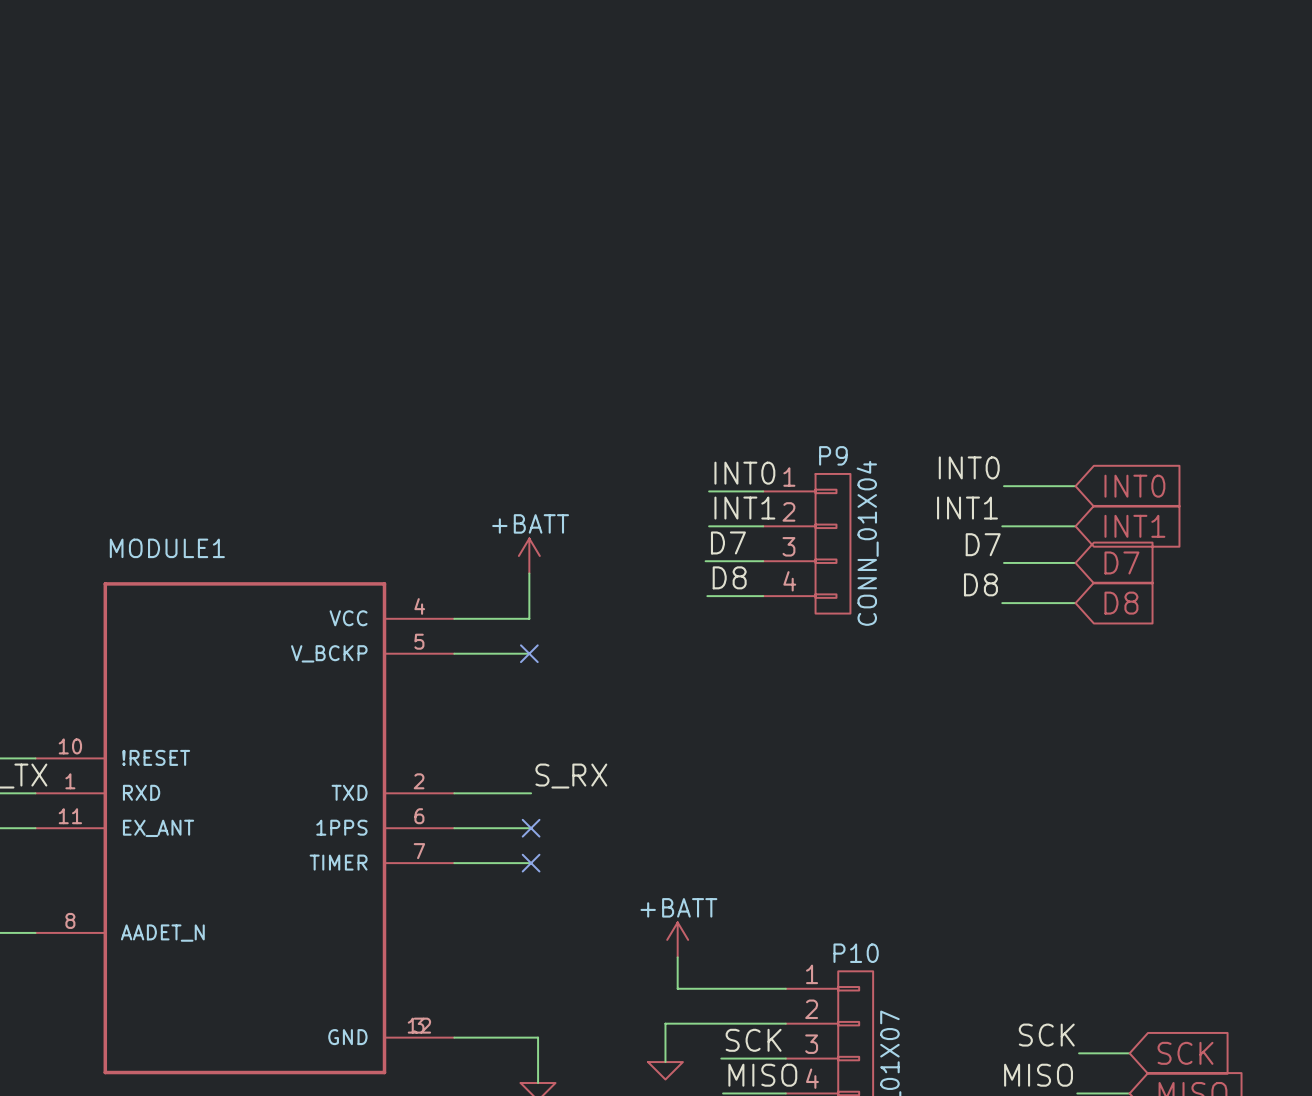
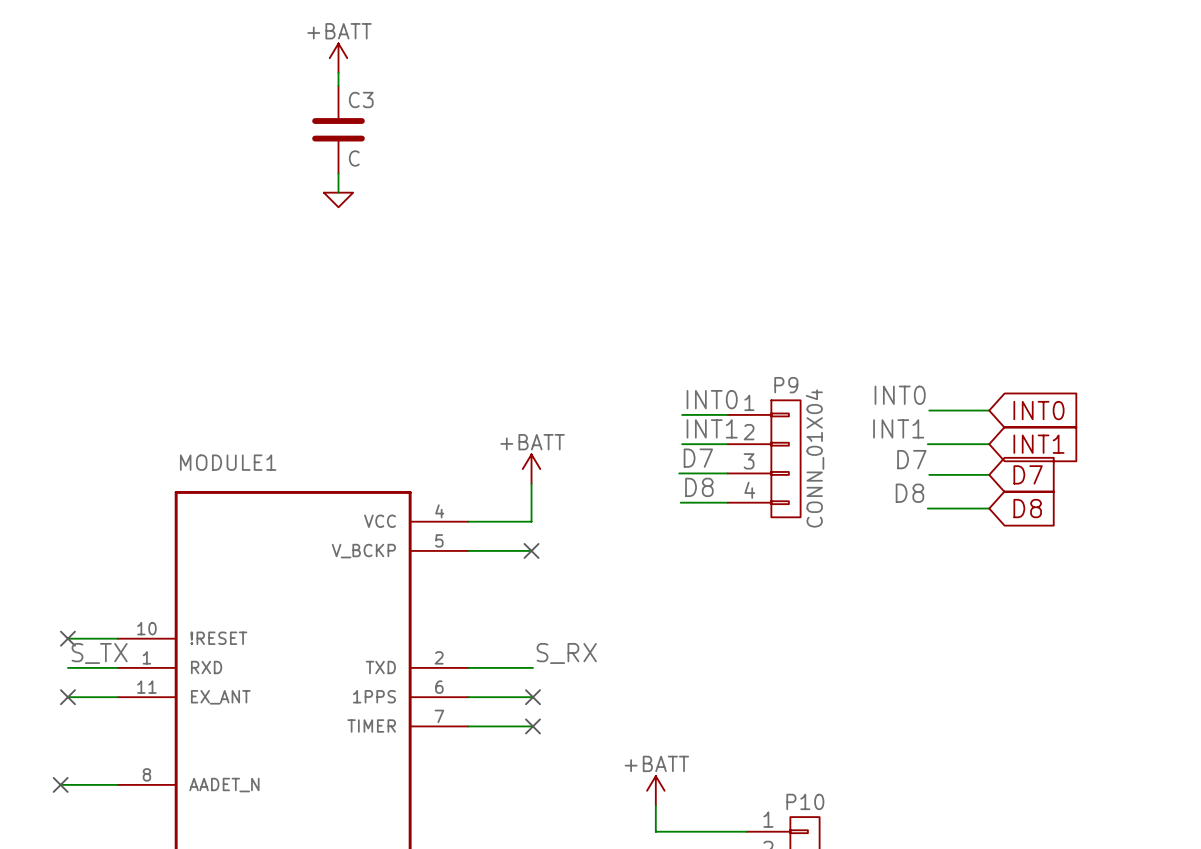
power symbol: none -> +BATT (338, 58)
wire: none -> (338, 72) (338, 85)
C3: none -> C (338, 129)
wire: none -> (338, 173) (338, 192)
power symbol: none -> (338, 199)

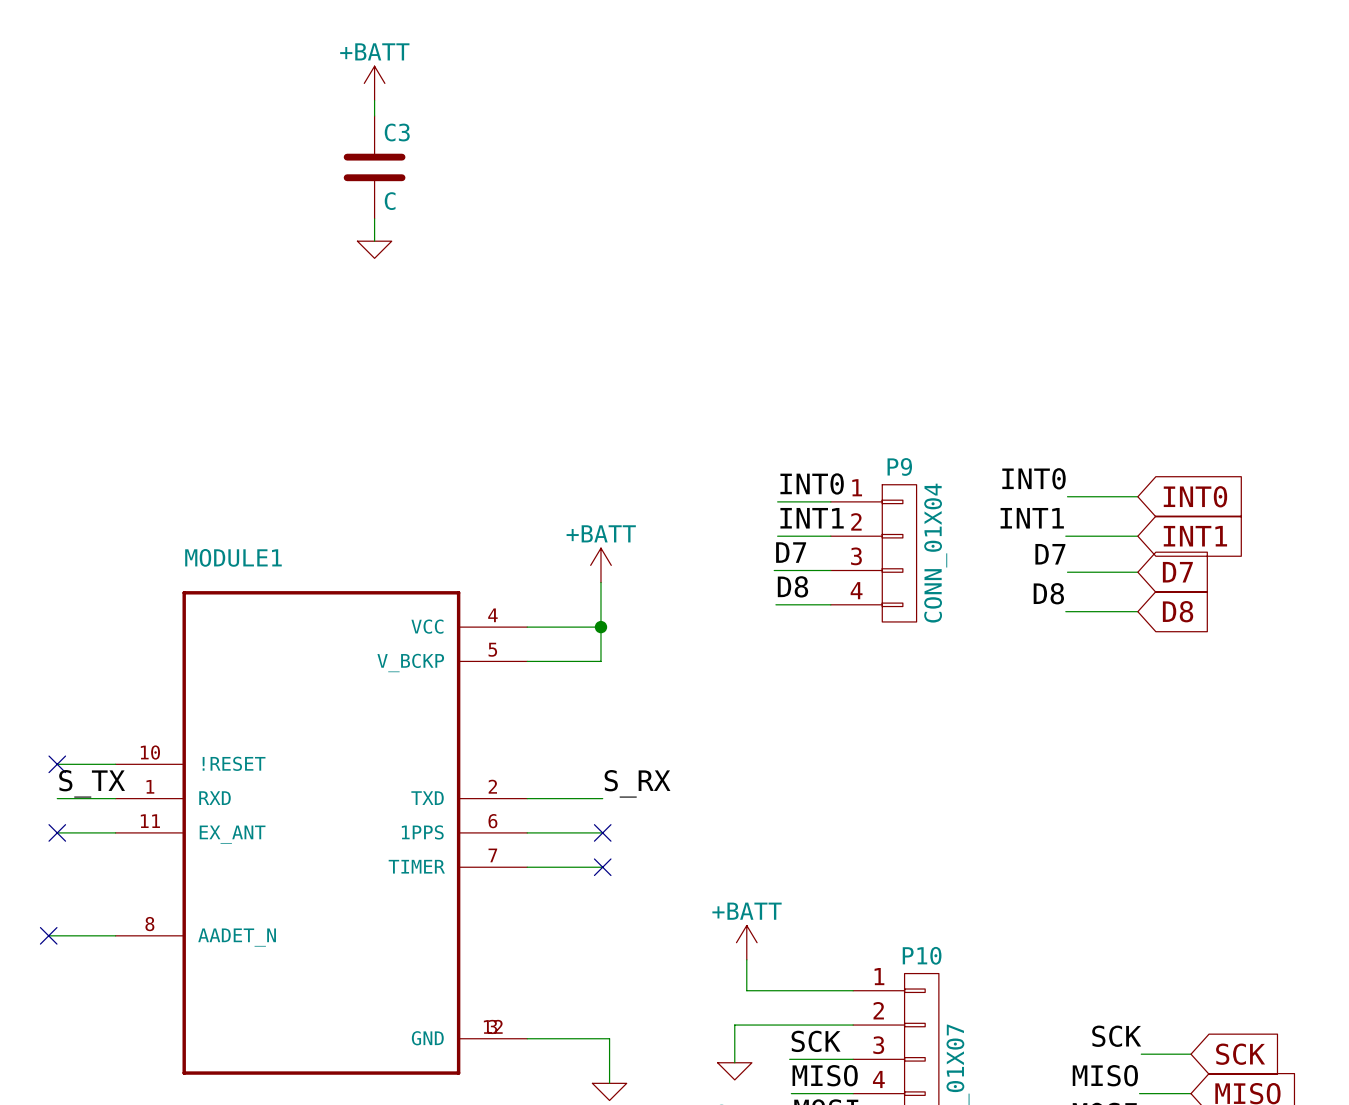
wire: none -> (600, 627) (600, 661)
junction: none -> (600, 627)
no-connect mark: (531, 550) -> none

